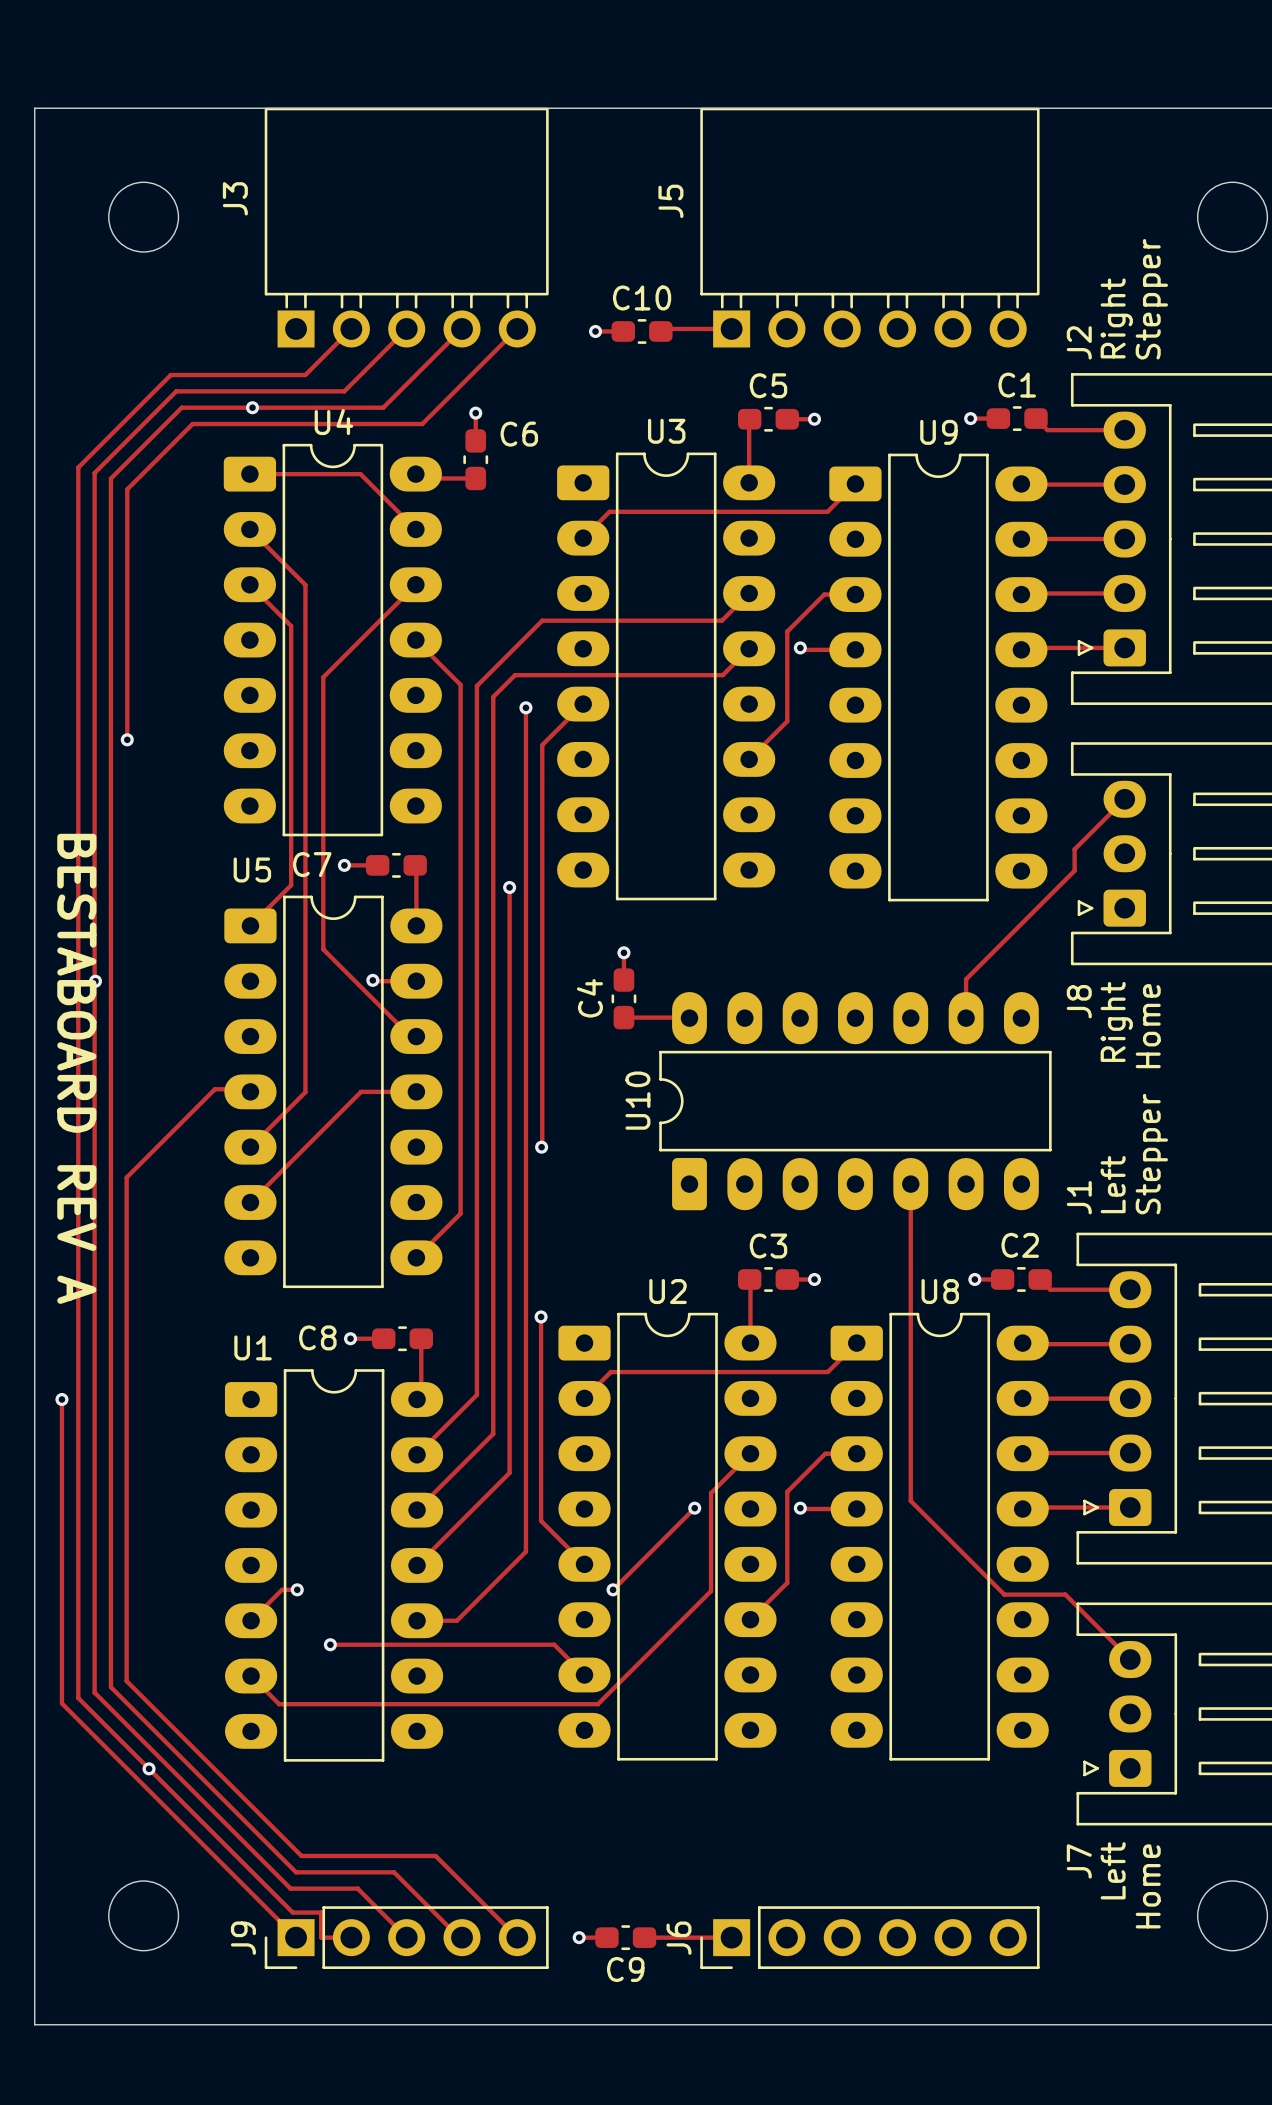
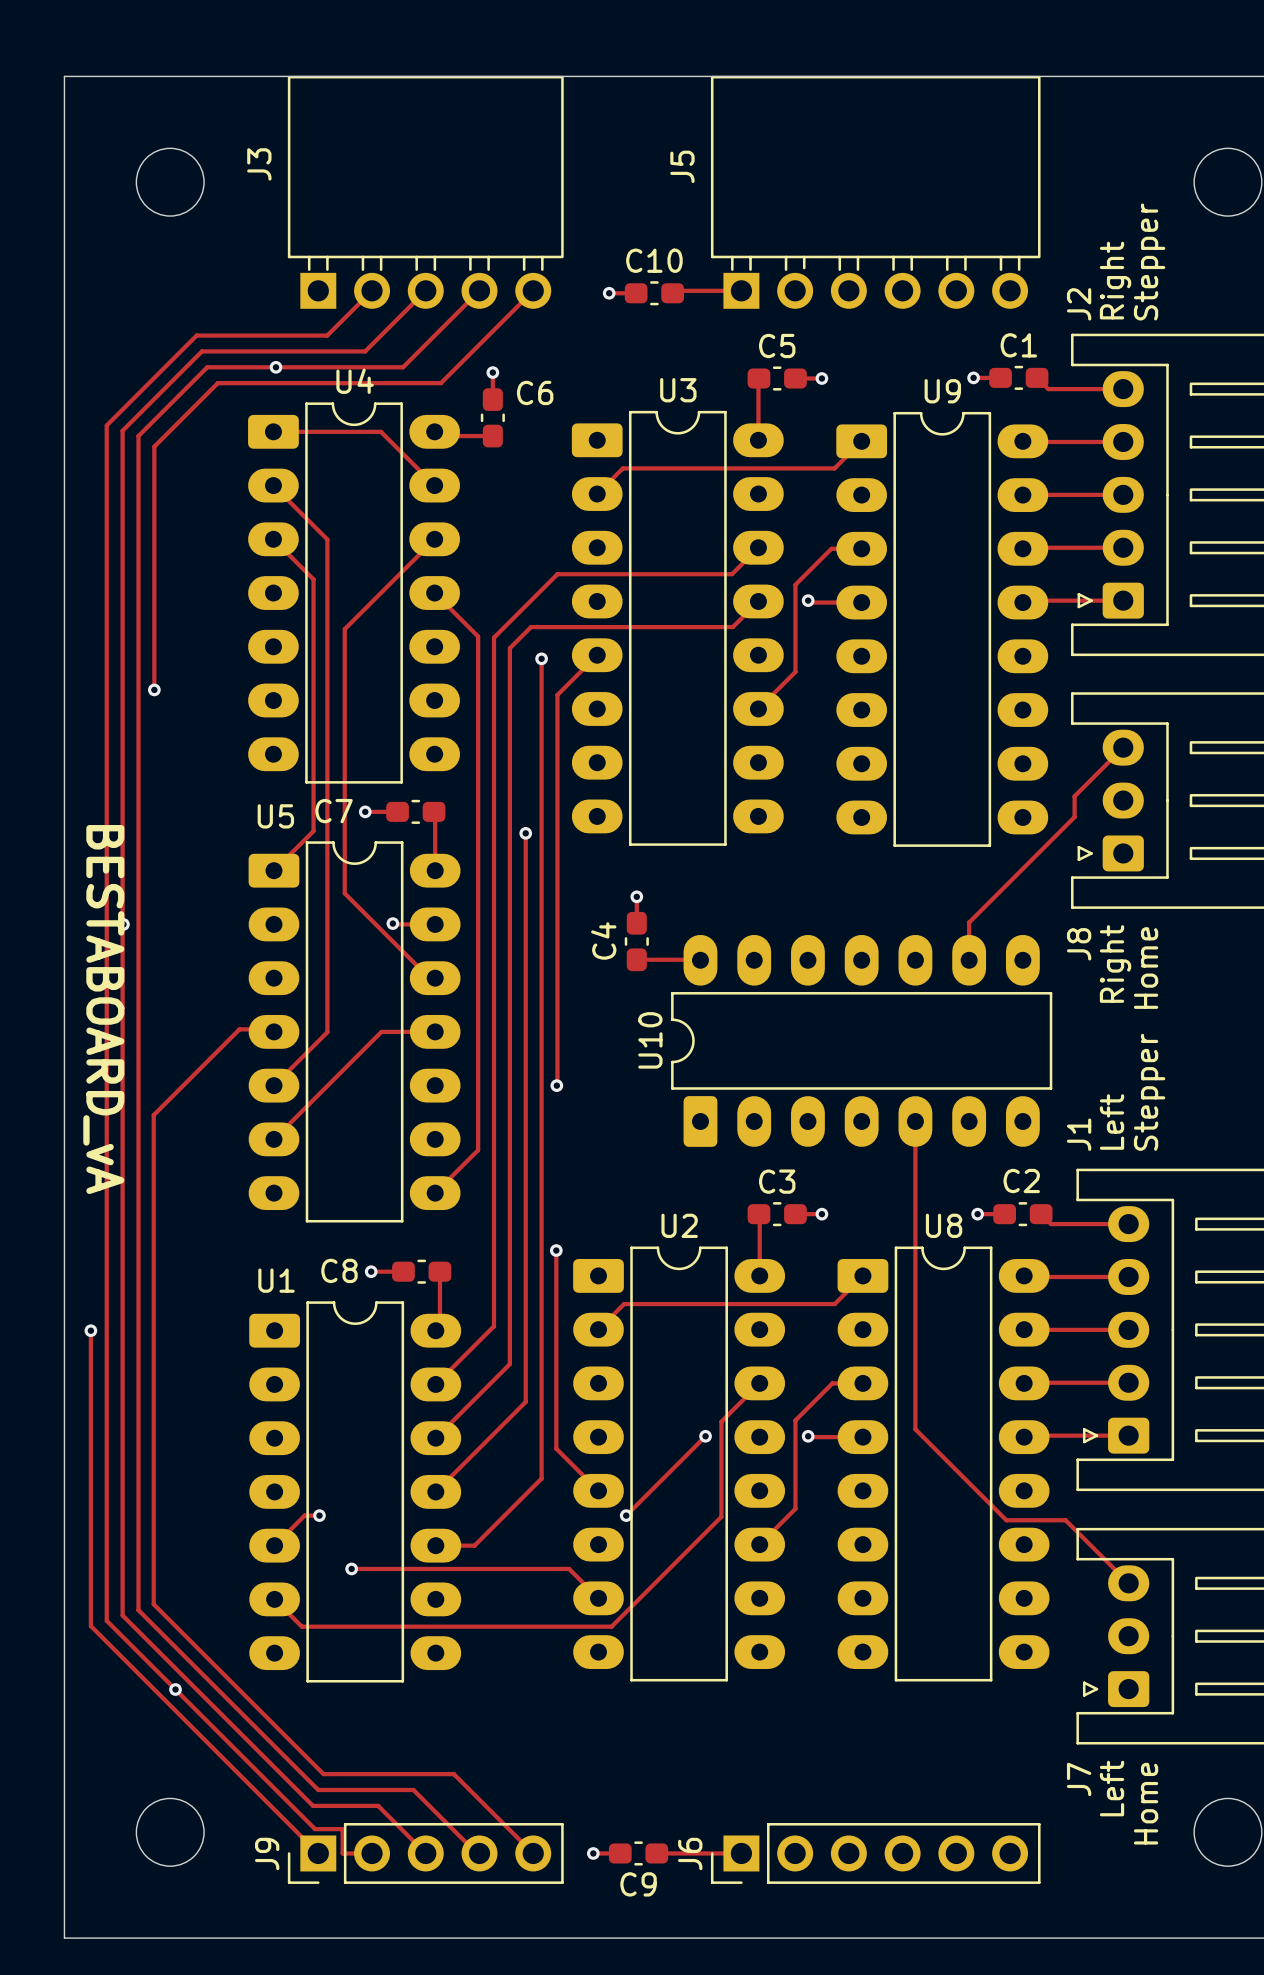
text: BESTABOARD REV A (76, 1068) -> BESTABOARD_vA (103, 1009)

